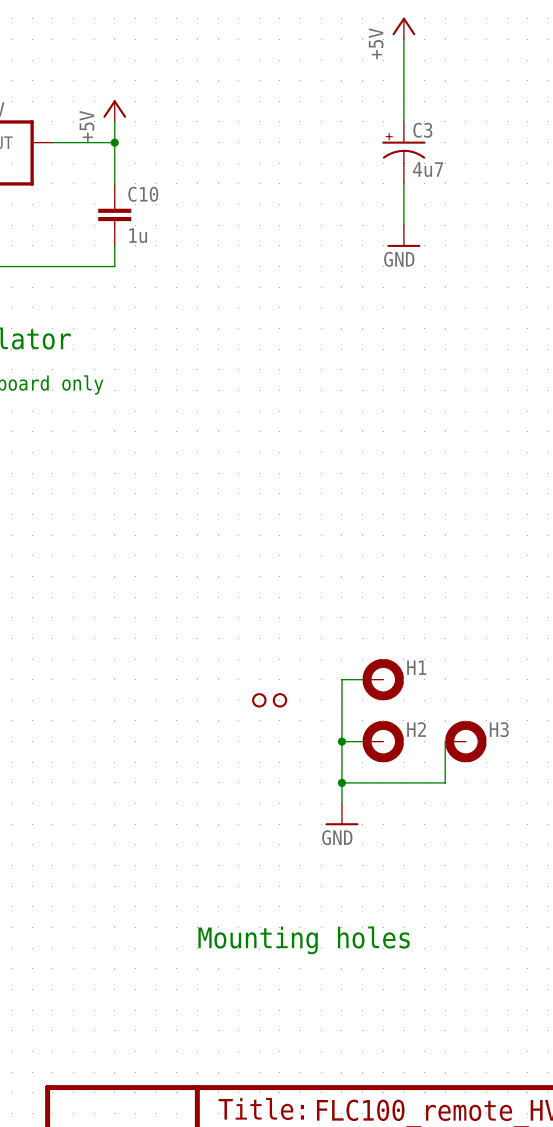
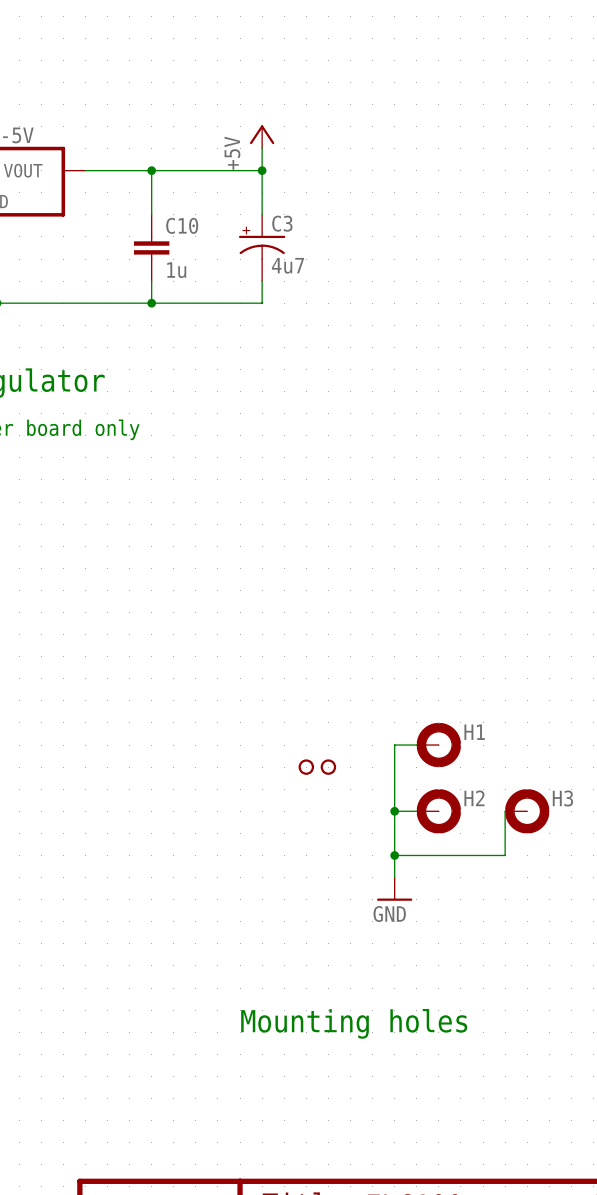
power symbol: +5V (403, 28) -> none
wire: (403, 39) (403, 121) -> none
power symbol: +5V (114, 111) -> none
power symbol: none -> +5V (262, 136)
wire: (114, 121) (114, 142) -> (262, 170) (151, 170)
wire: none -> (262, 148) (262, 214)
junction: none -> (262, 170)
C3 position: (403, 152) -> (262, 247)
wire: (403, 183) (403, 225) -> none
power symbol: GND (403, 236) -> none
wire: none -> (262, 281) (262, 303) (151, 303)
junction: none -> (151, 303)

